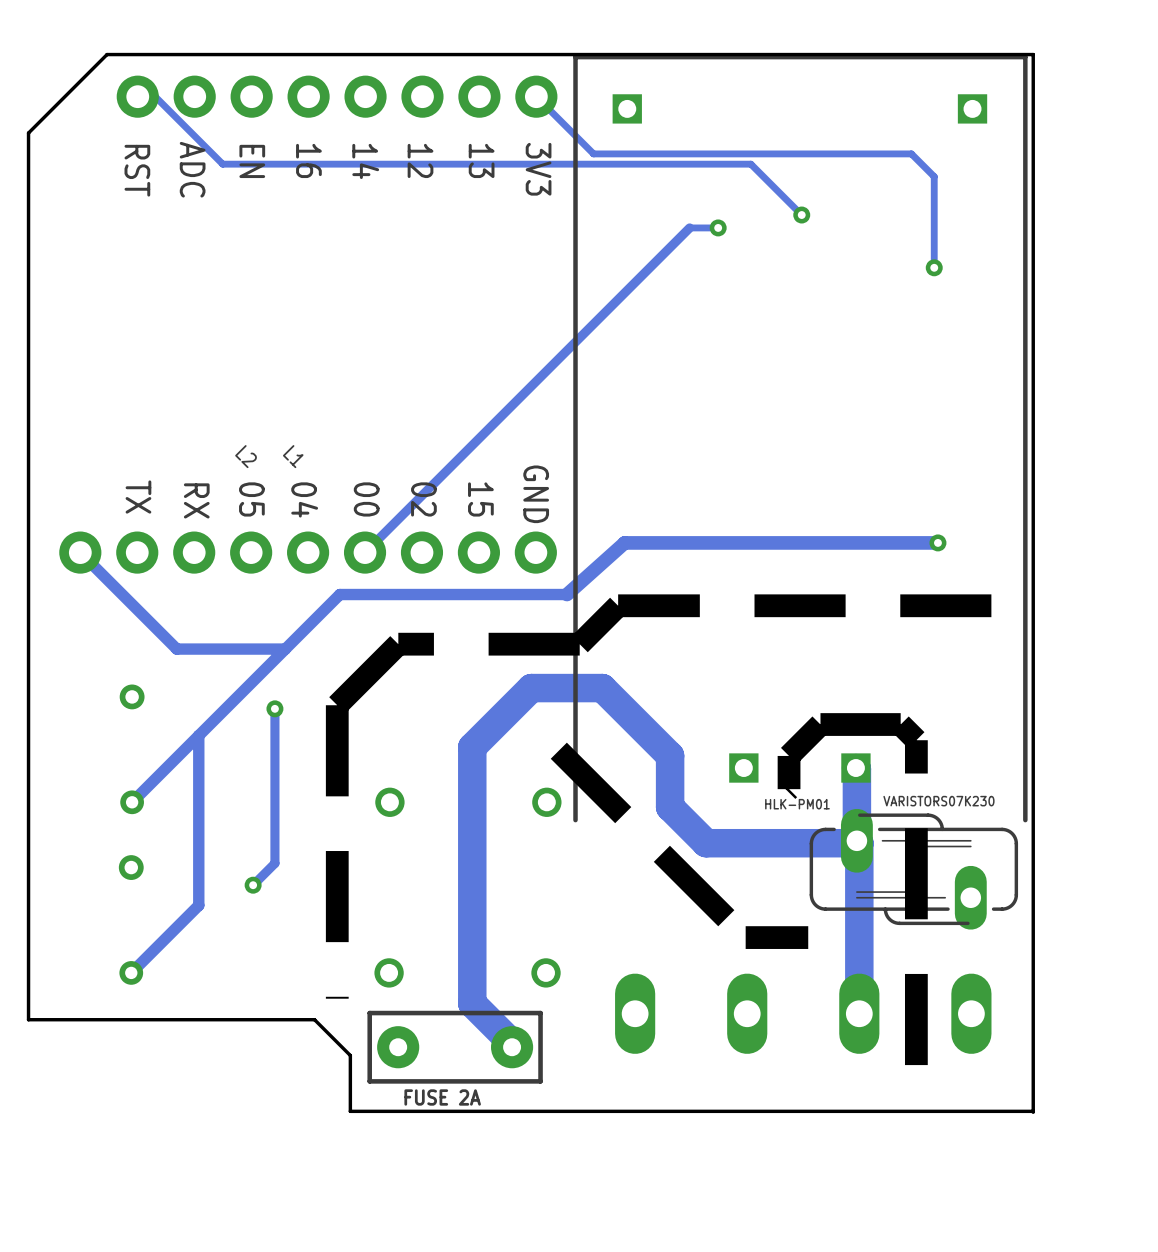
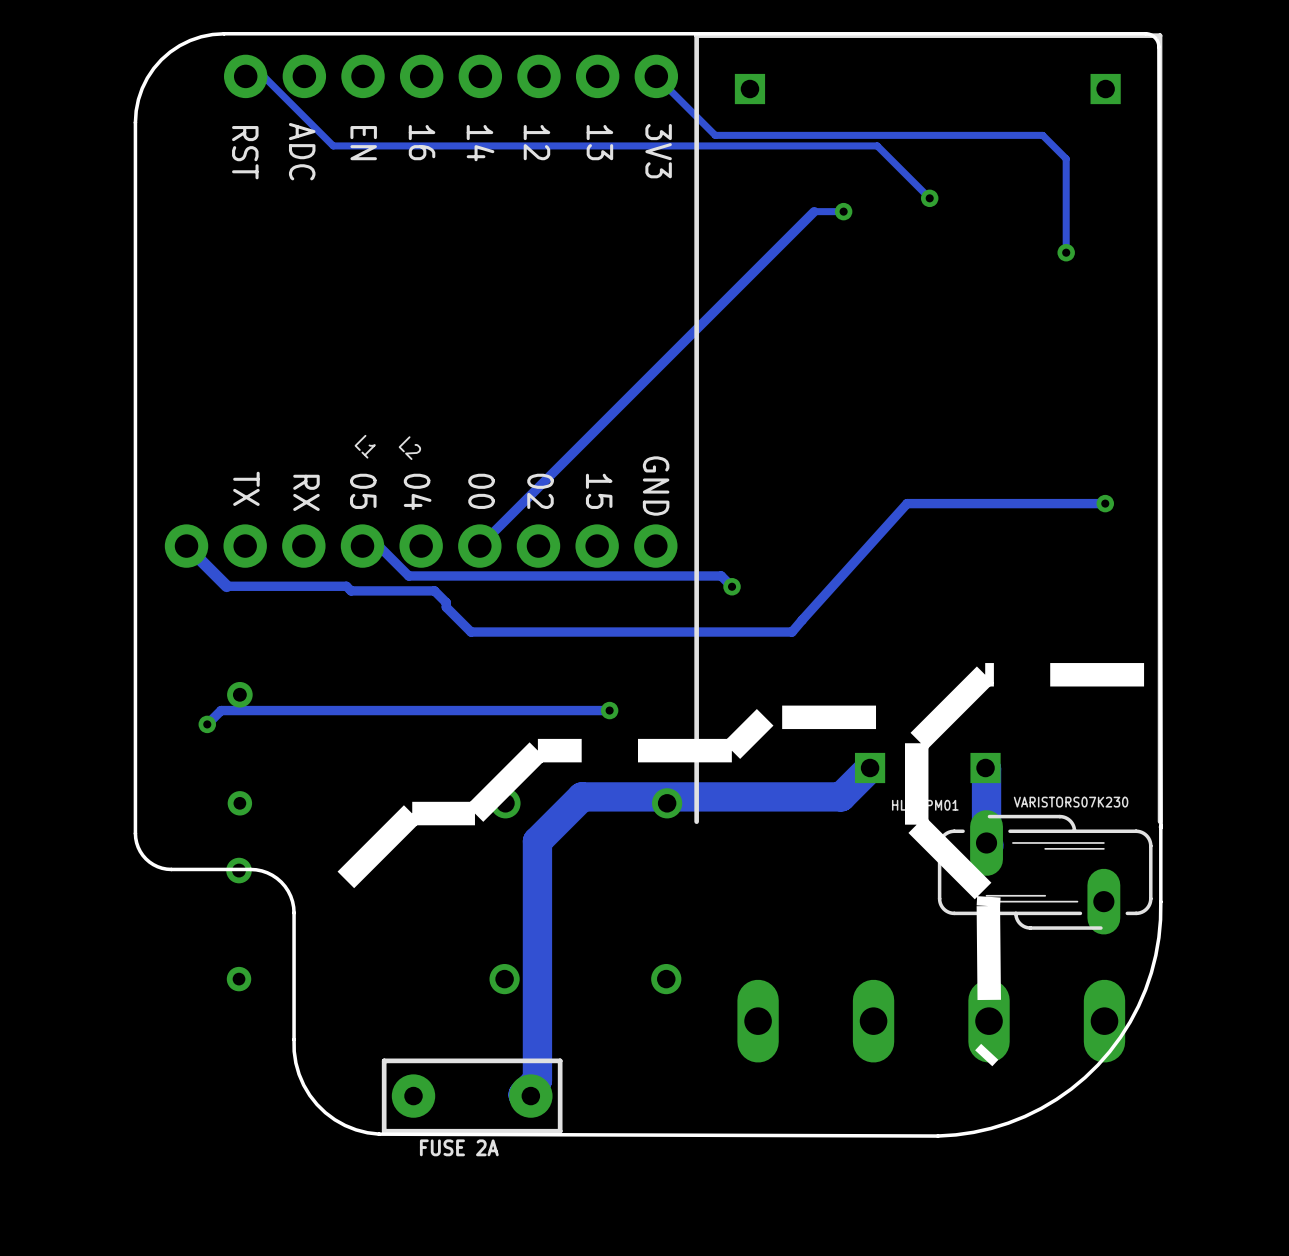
text position: L2 (246, 456) -> L2 (409, 448)
text position: L1 (293, 456) -> L1 (365, 446)
track: (937, 542) (624, 542) (567, 594) (339, 594) (132, 802) -> none
via position: (937, 542) -> (1105, 503)
track: none -> (362, 546) (378, 546) (408, 575) (721, 575) (732, 586)
track: (119, 591) (176, 649) (285, 649) -> (226, 586) (346, 586) (351, 590) (434, 590) (446, 602) (446, 607) (471, 632) (792, 632) (907, 503) (1105, 503)
via: none -> (732, 586)
board edge: (991, 605) (618, 605) (579, 644) (398, 644) (337, 705) (337, 998) -> none
board edge: none -> (1144, 674) (985, 674) (916, 743) (916, 824) (988, 896) (989, 1051) (983, 1058)
track: (274, 708) (274, 863) (253, 885) -> none
via: (274, 708) -> none
track: none -> (609, 710) (221, 710) (207, 724)
via: none -> (609, 710)
board edge: none -> (876, 717) (765, 717) (731, 750) (537, 750) (474, 813) (412, 813) (330, 894)
via: none -> (207, 724)
track: (198, 735) (198, 905) (131, 972) -> none
board edge: (558, 750) (745, 937) (808, 937) -> none
track: none -> (870, 768) (841, 796) (581, 796) (537, 841) (537, 1080) (523, 1094) (530, 1096)
board edge: (787, 790) (789, 789) (789, 755) (820, 724) (900, 724) (916, 740) (916, 1065) -> none
board edge: none -> (1160, 825) (1160, 901) (1160, 919) (1158, 937) (1151, 972) (1138, 1006) (1120, 1037) (1085, 1077) (1056, 1099) (1008, 1123) (973, 1132) (937, 1136) (379, 1134) (356, 1129) (334, 1119) (325, 1112) (309, 1095) (299, 1074) (295, 1063) (294, 1039) (294, 912) (292, 901) (285, 886) (272, 875) (256, 869) (162, 868) (149, 862) (142, 855) (135, 838) (135, 122) (138, 99) (147, 78) (153, 68) (170, 52) (190, 40) (201, 36) (224, 33) (1145, 33) (1153, 36) (1158, 47) (1161, 825) (1160, 826) (1160, 826) (1160, 826) (1160, 826) (1160, 827) (1160, 827) (1160, 827) (1160, 827)
via: (253, 885) -> none
track: (859, 1013) (859, 843) (706, 843) (670, 807) (670, 755) (602, 688) (531, 688) (472, 747) (472, 1003) (512, 1043) (512, 1047) -> none
part position: (455, 1047) -> (472, 1096)
board edge: (1033, 1111) (350, 1111) (350, 1055) (314, 1019) (28, 1019) (28, 133) (107, 54) (1033, 54) (1033, 1112) -> none

